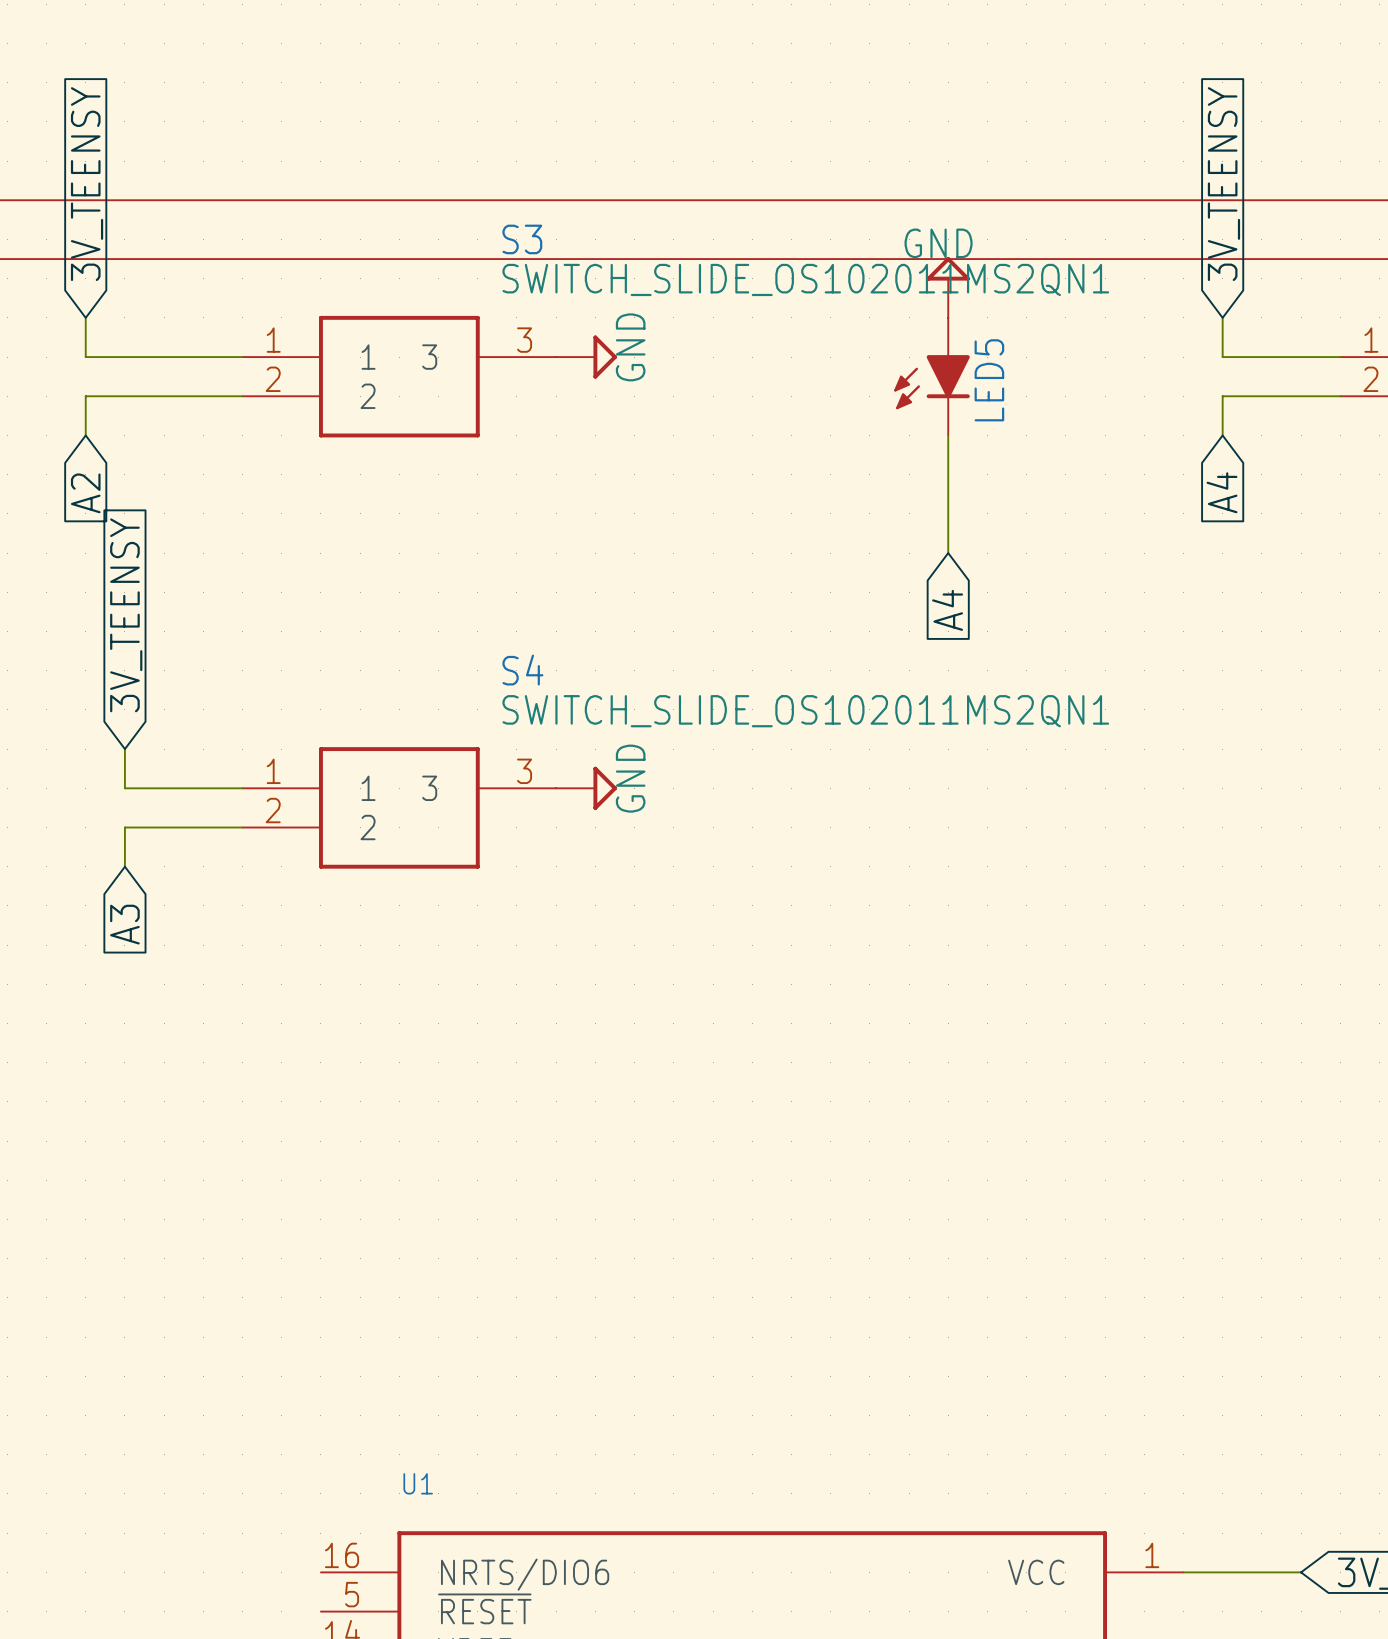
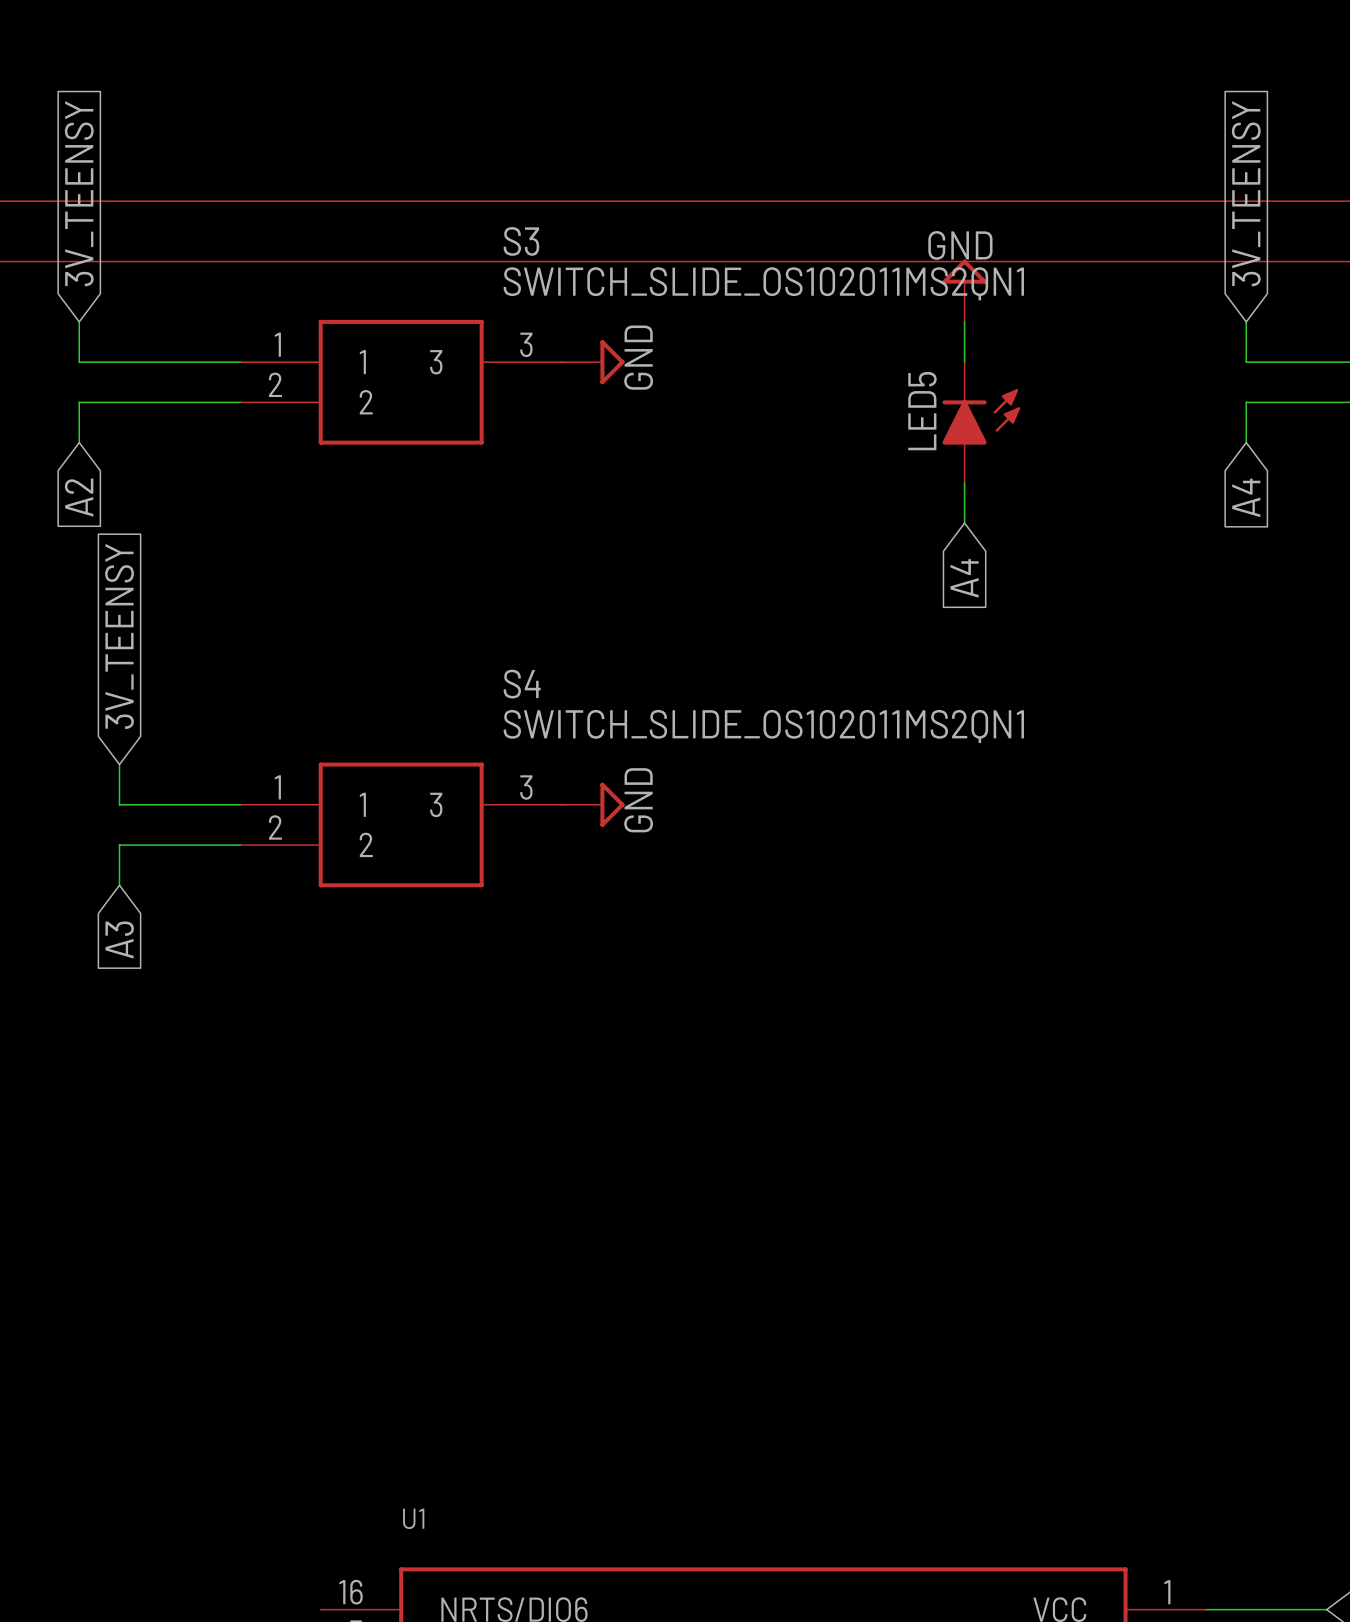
LED5 rotation: 0° (931, 382) -> 180° (981, 416)
wire: (948, 513) (948, 553) -> none
global label position: A4 (947, 610) -> A4 (964, 578)

